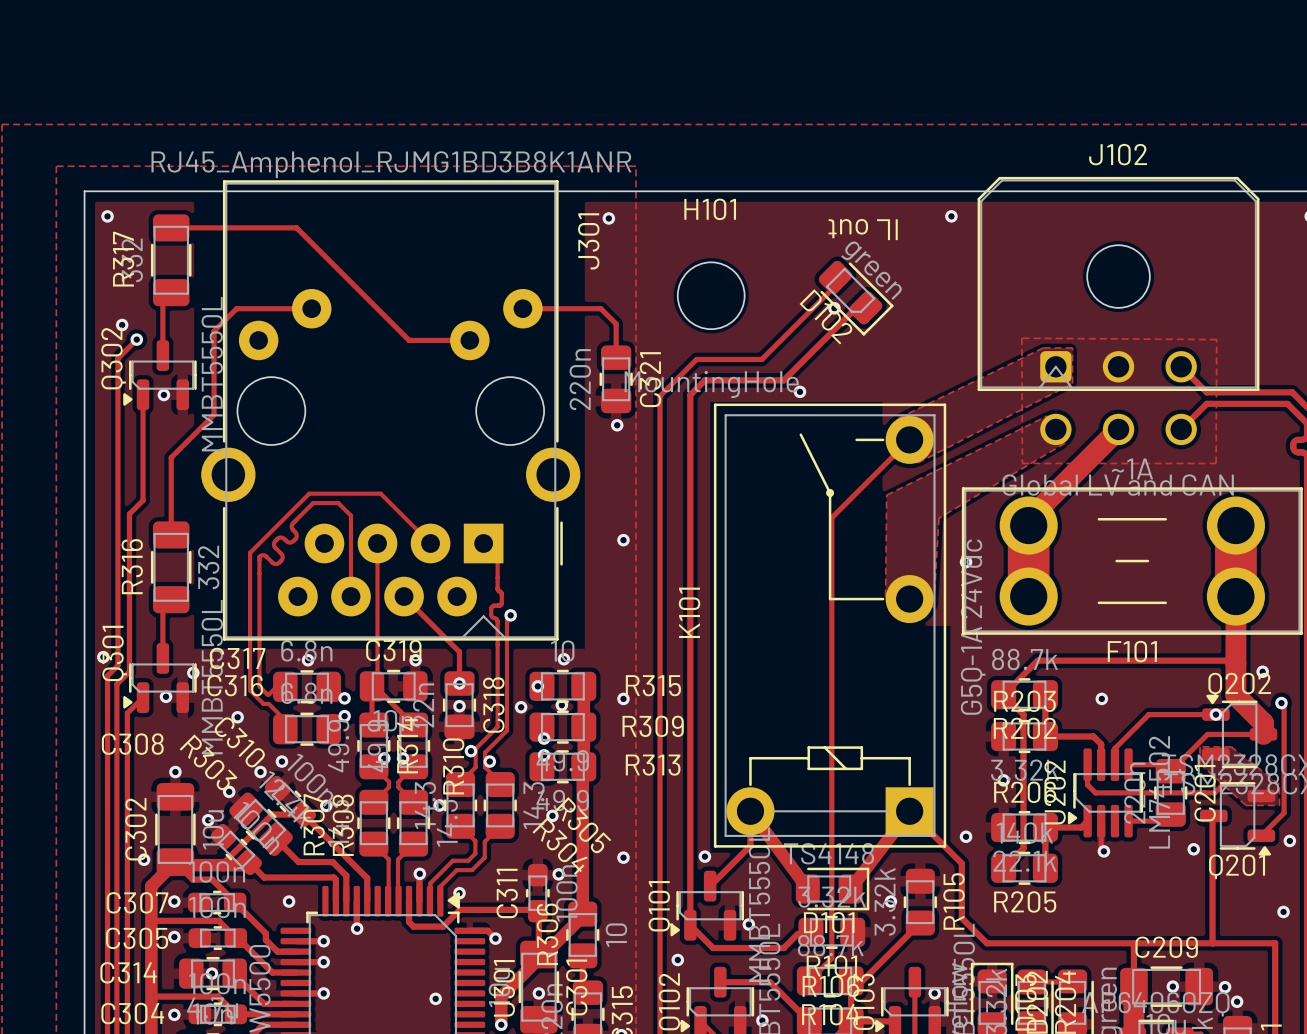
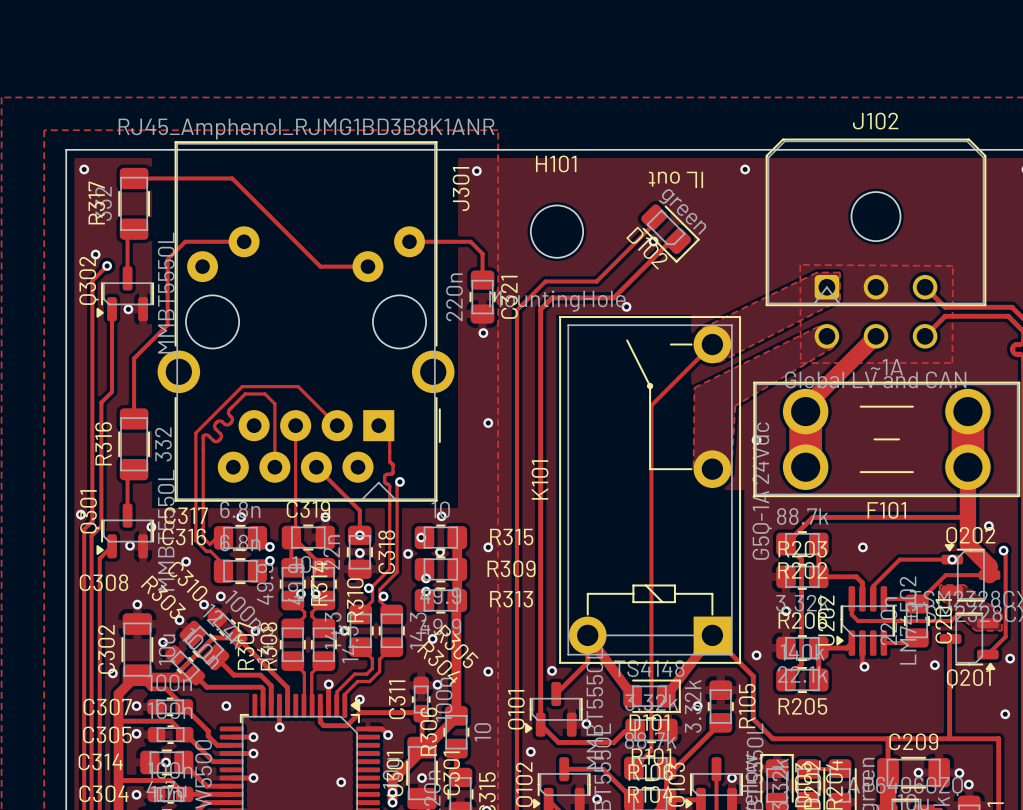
via: none -> (392, 792)

